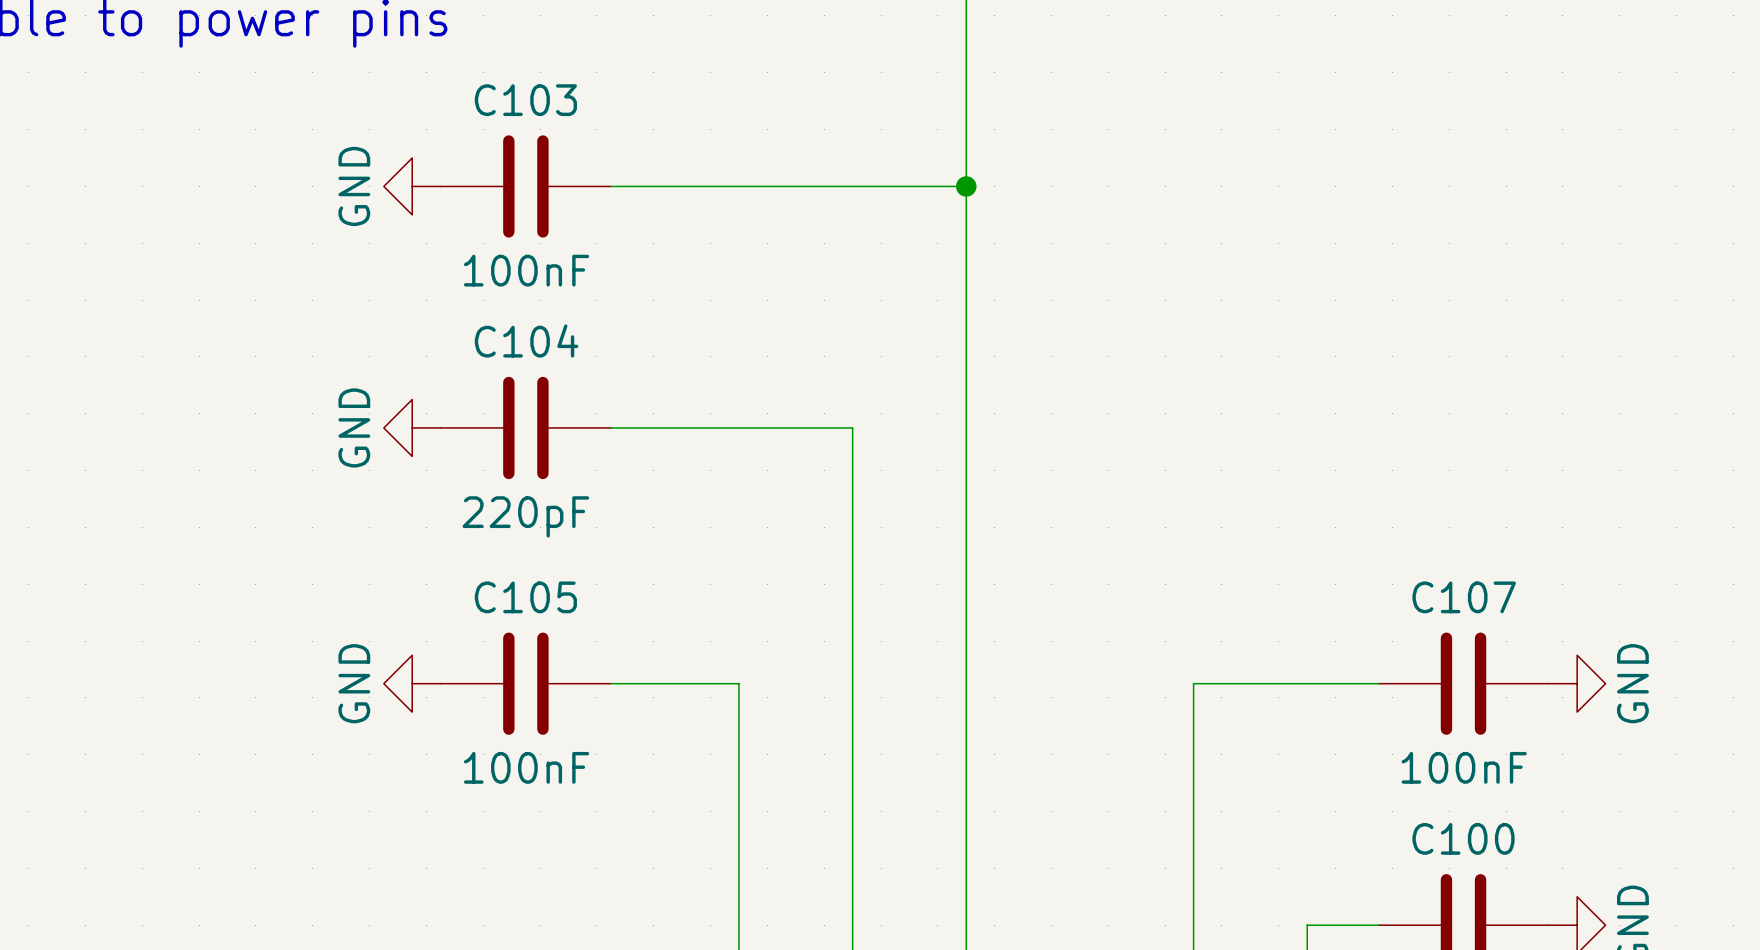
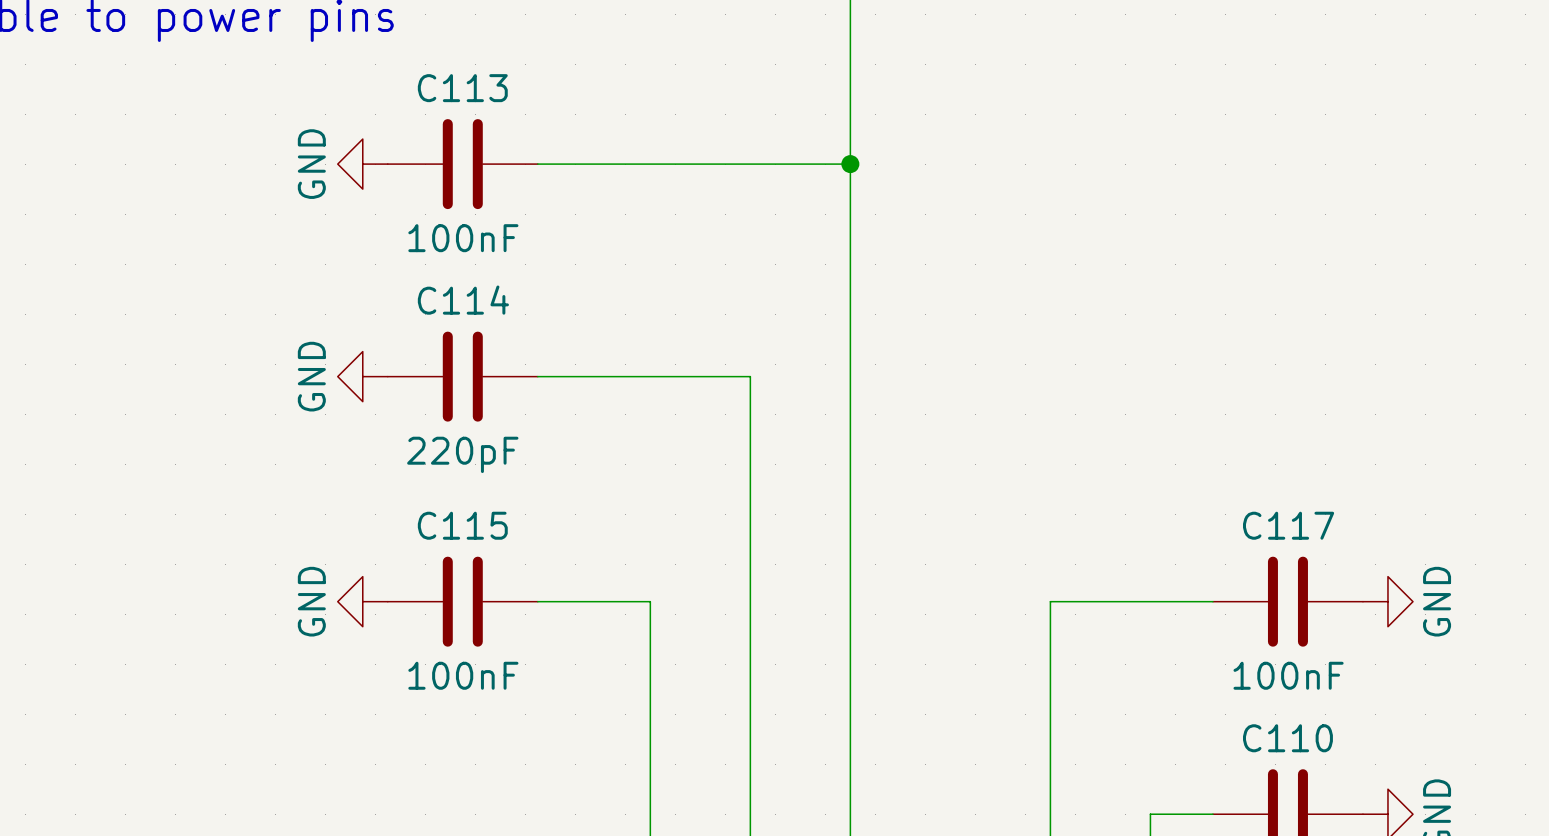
C103 name: C103 (525, 100) -> C113 (462, 88)
C104 name: C104 (526, 340) -> C114 (463, 300)
C105 name: C105 (525, 597) -> C115 (462, 525)
C107 name: C107 (1464, 597) -> C117 (1288, 525)
C100 name: C100 (1463, 838) -> C110 (1287, 738)

